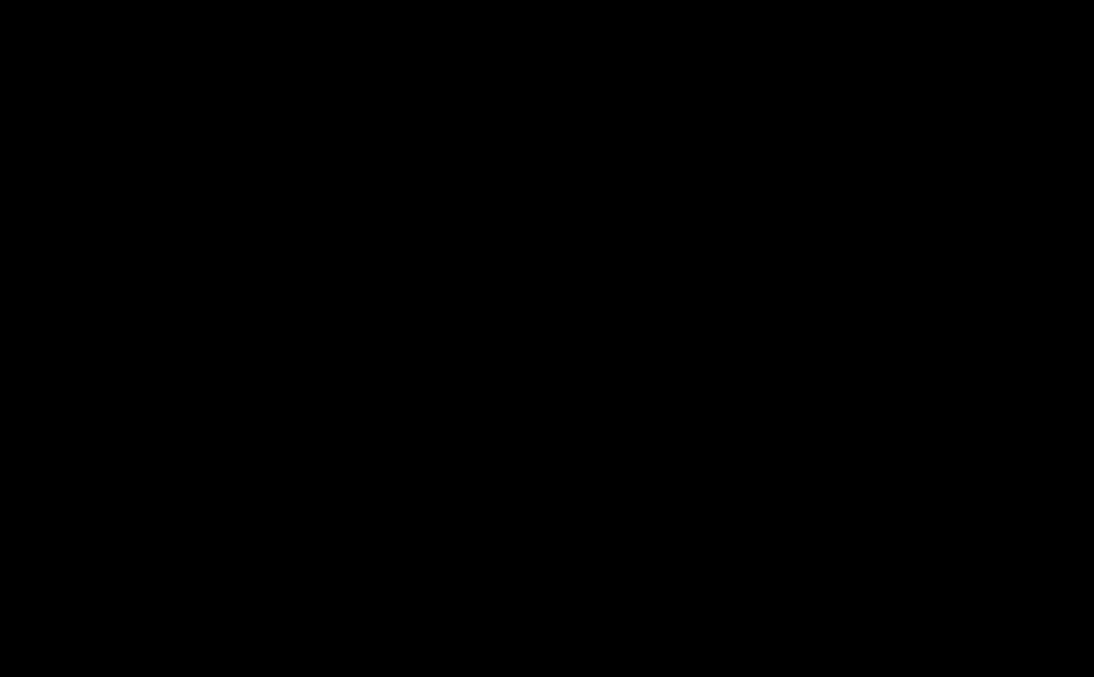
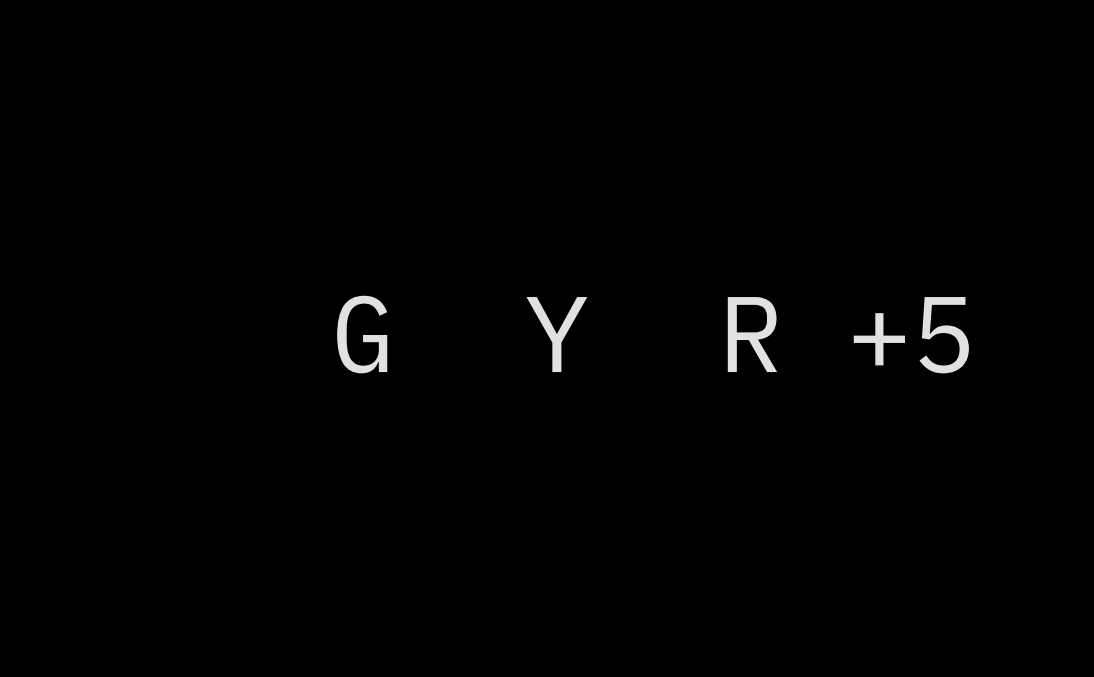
text: none -> G Y R +5 (653, 334)

